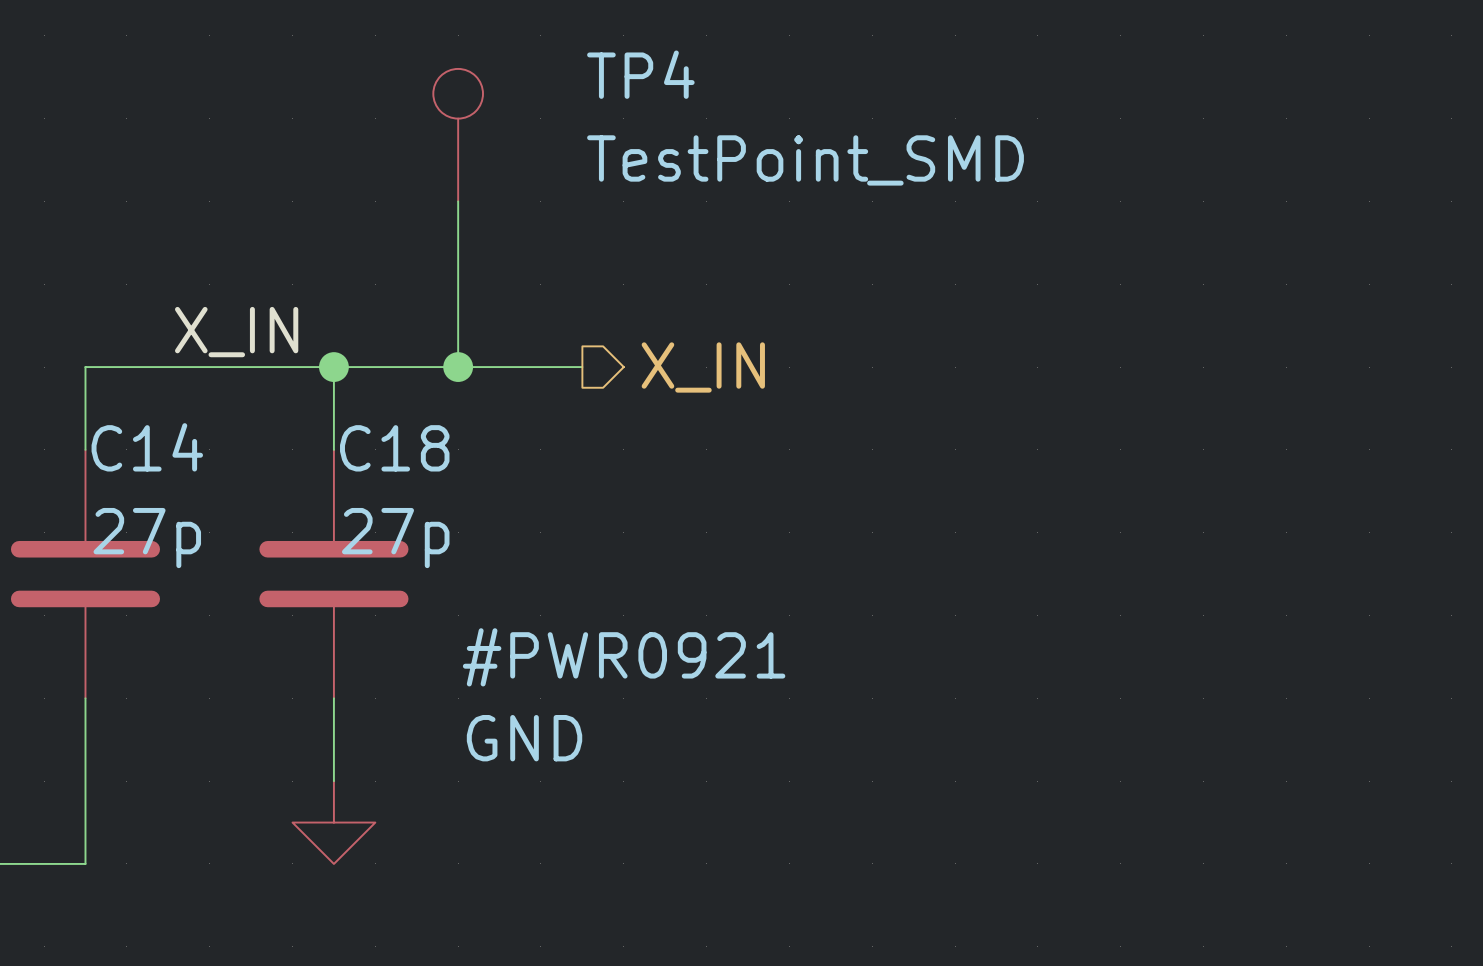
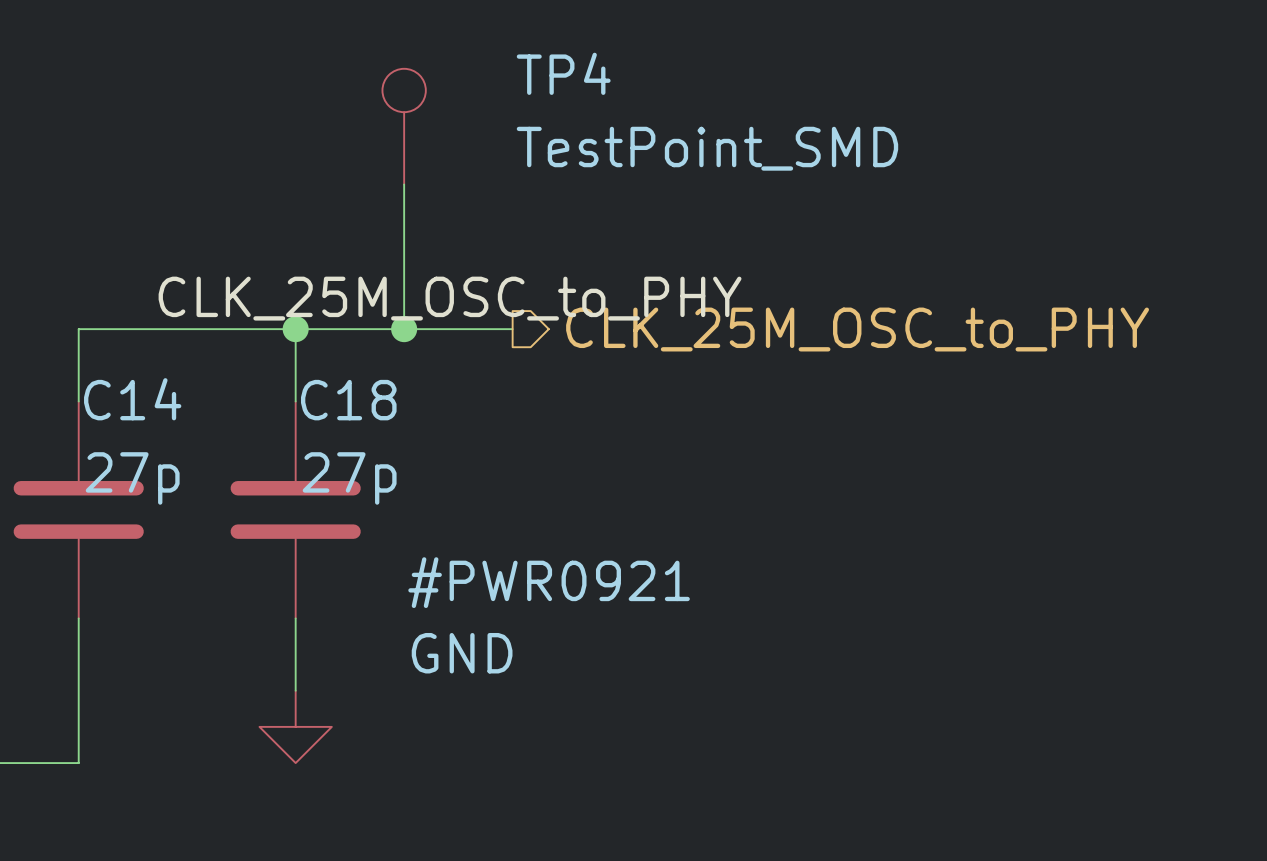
label: X_IN (236, 332) -> CLK_25M_OSC_to_PHY (450, 298)
hierarchical label: X_IN (703, 367) -> CLK_25M_OSC_to_PHY (857, 329)

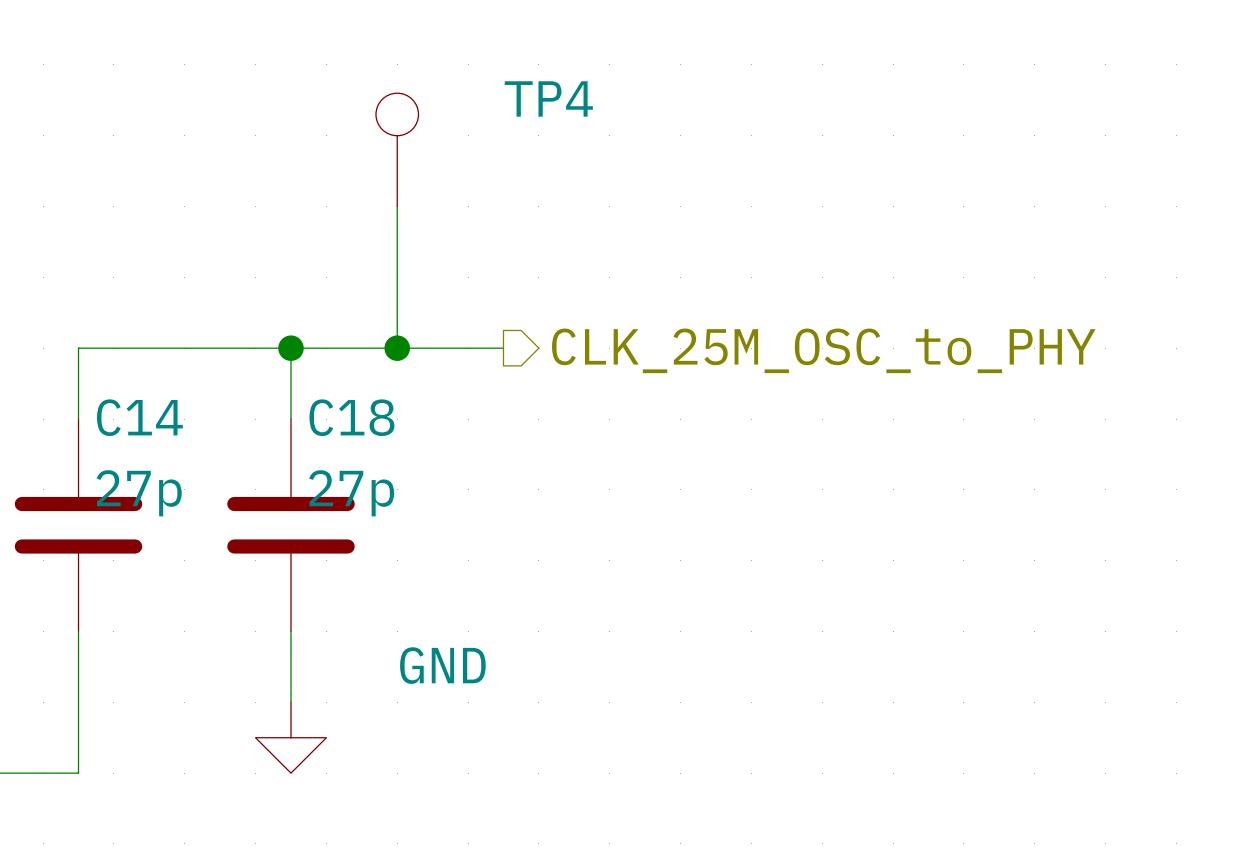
TP4 value: TestPoint_SMD (707, 148) -> none
label: CLK_25M_OSC_to_PHY (450, 298) -> none
#PWR0921 name: #PWR0921 (549, 582) -> none

